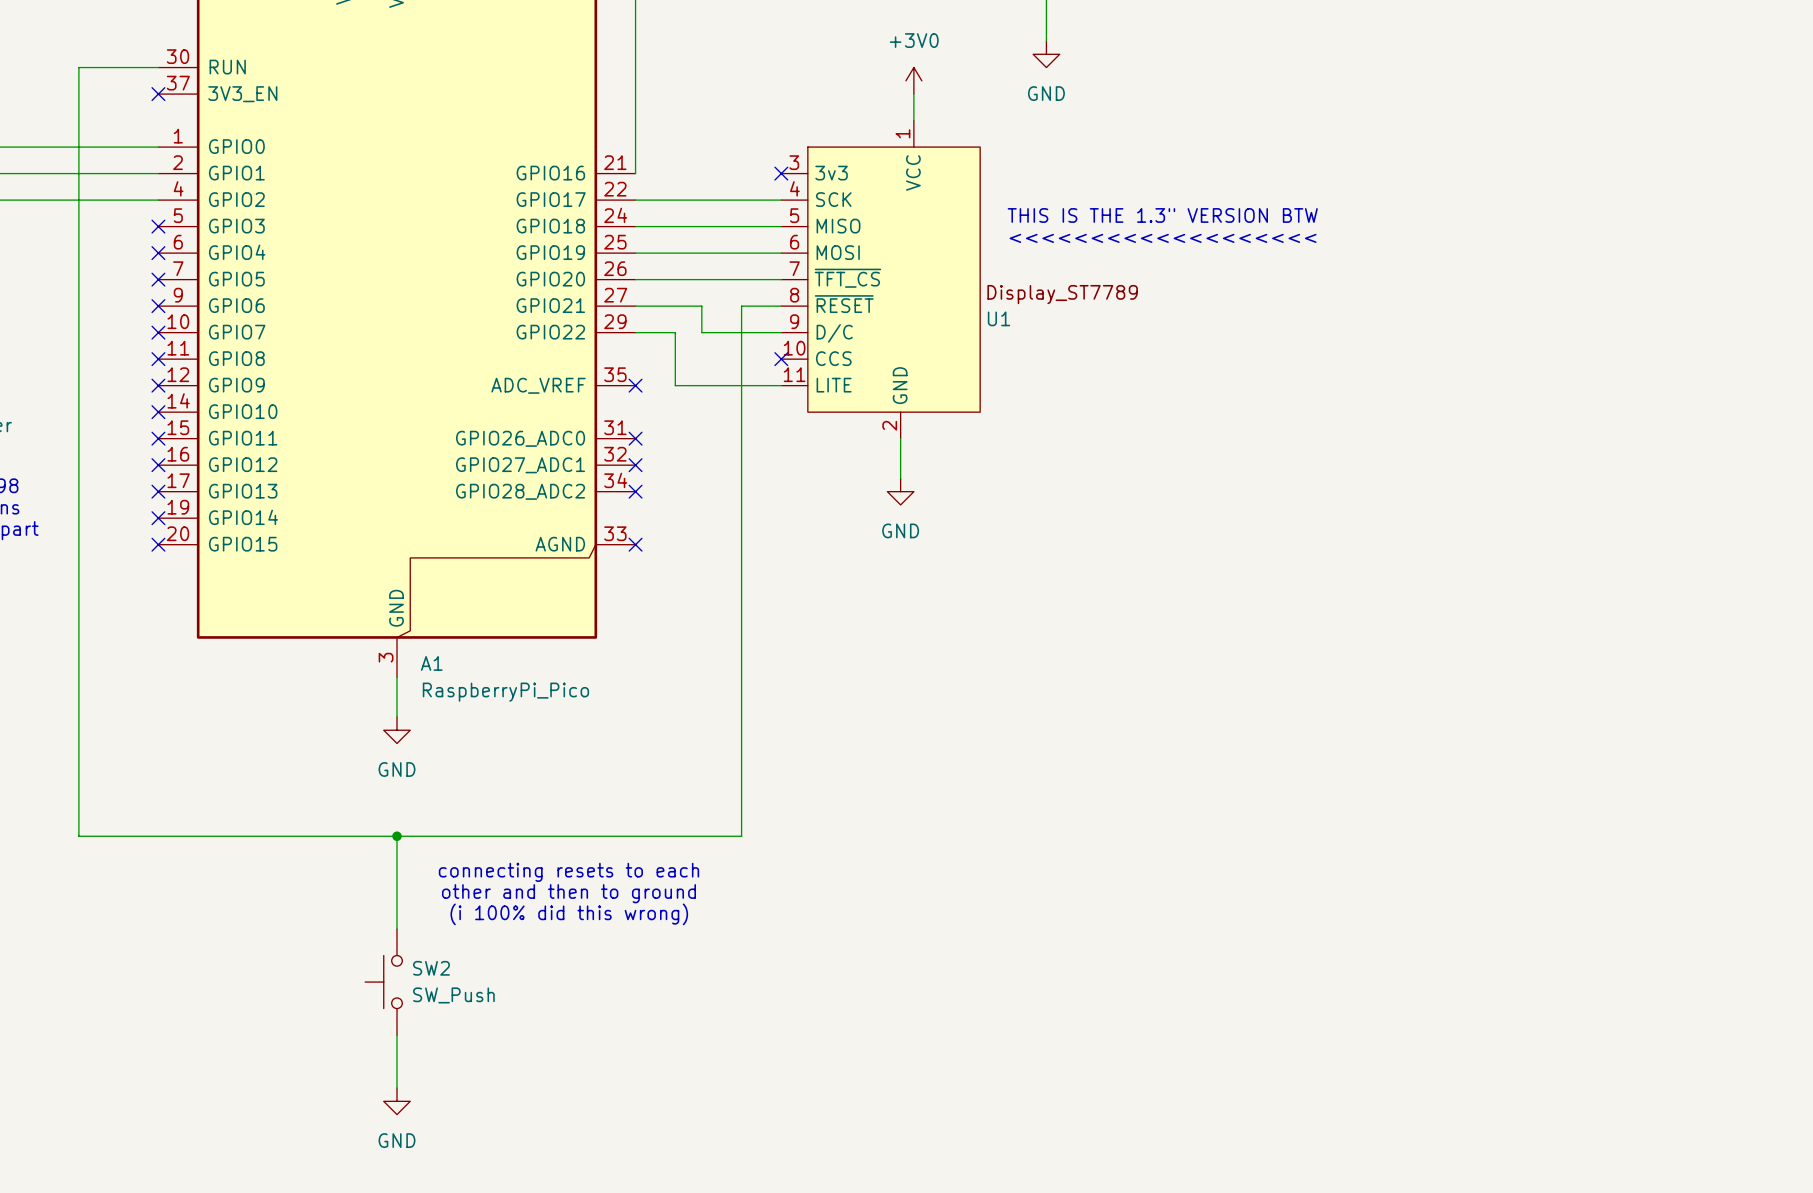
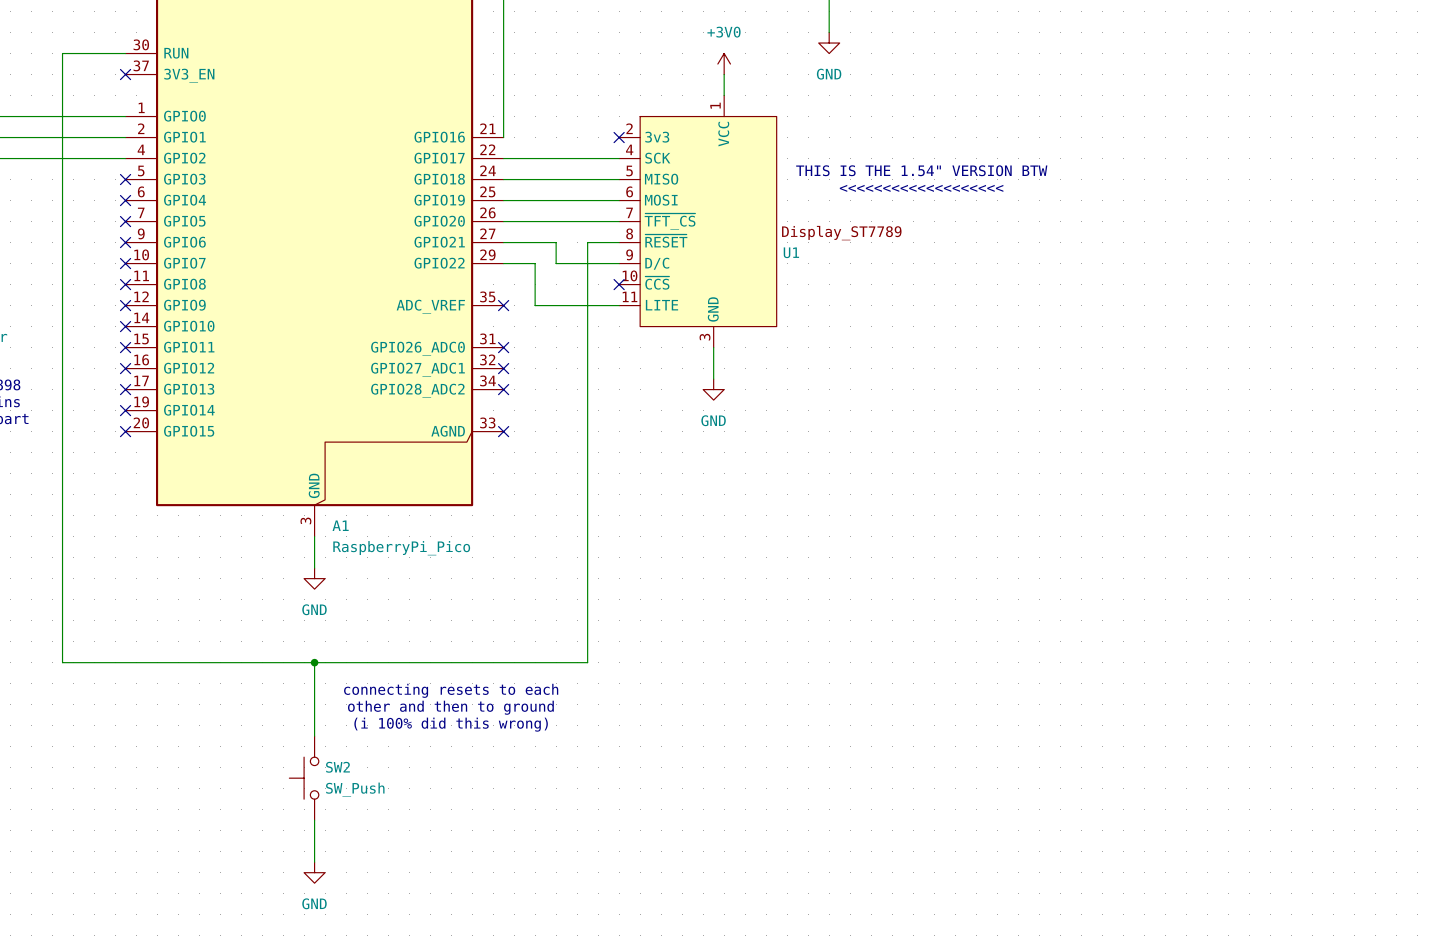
U1 pin number: 3 (794, 162) -> 2 (629, 128)
text: THIS IS THE 1.3" VERSION BTW (1162, 215) -> THIS IS THE 1.54" VERSION BTW (921, 170)
U1 pin name: CCS (833, 358) -> ~{CCS} (657, 283)
U1 pin number: 2 (889, 425) -> 3 (705, 337)

